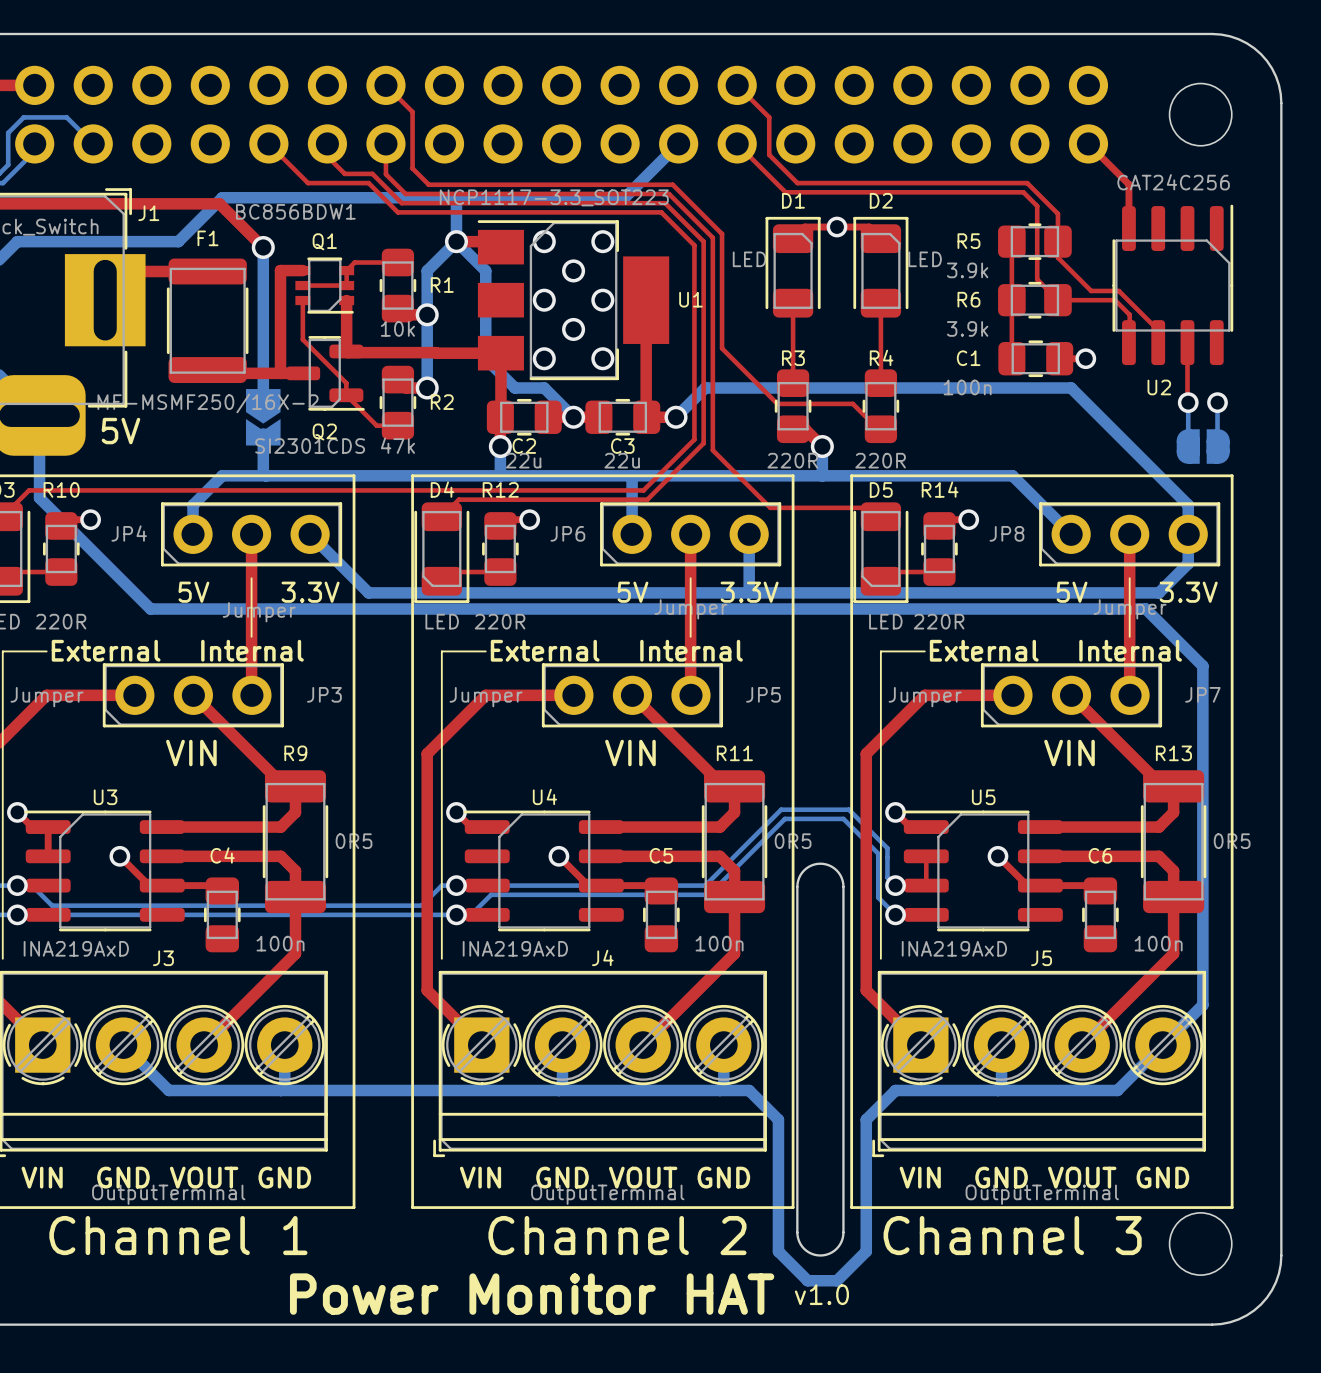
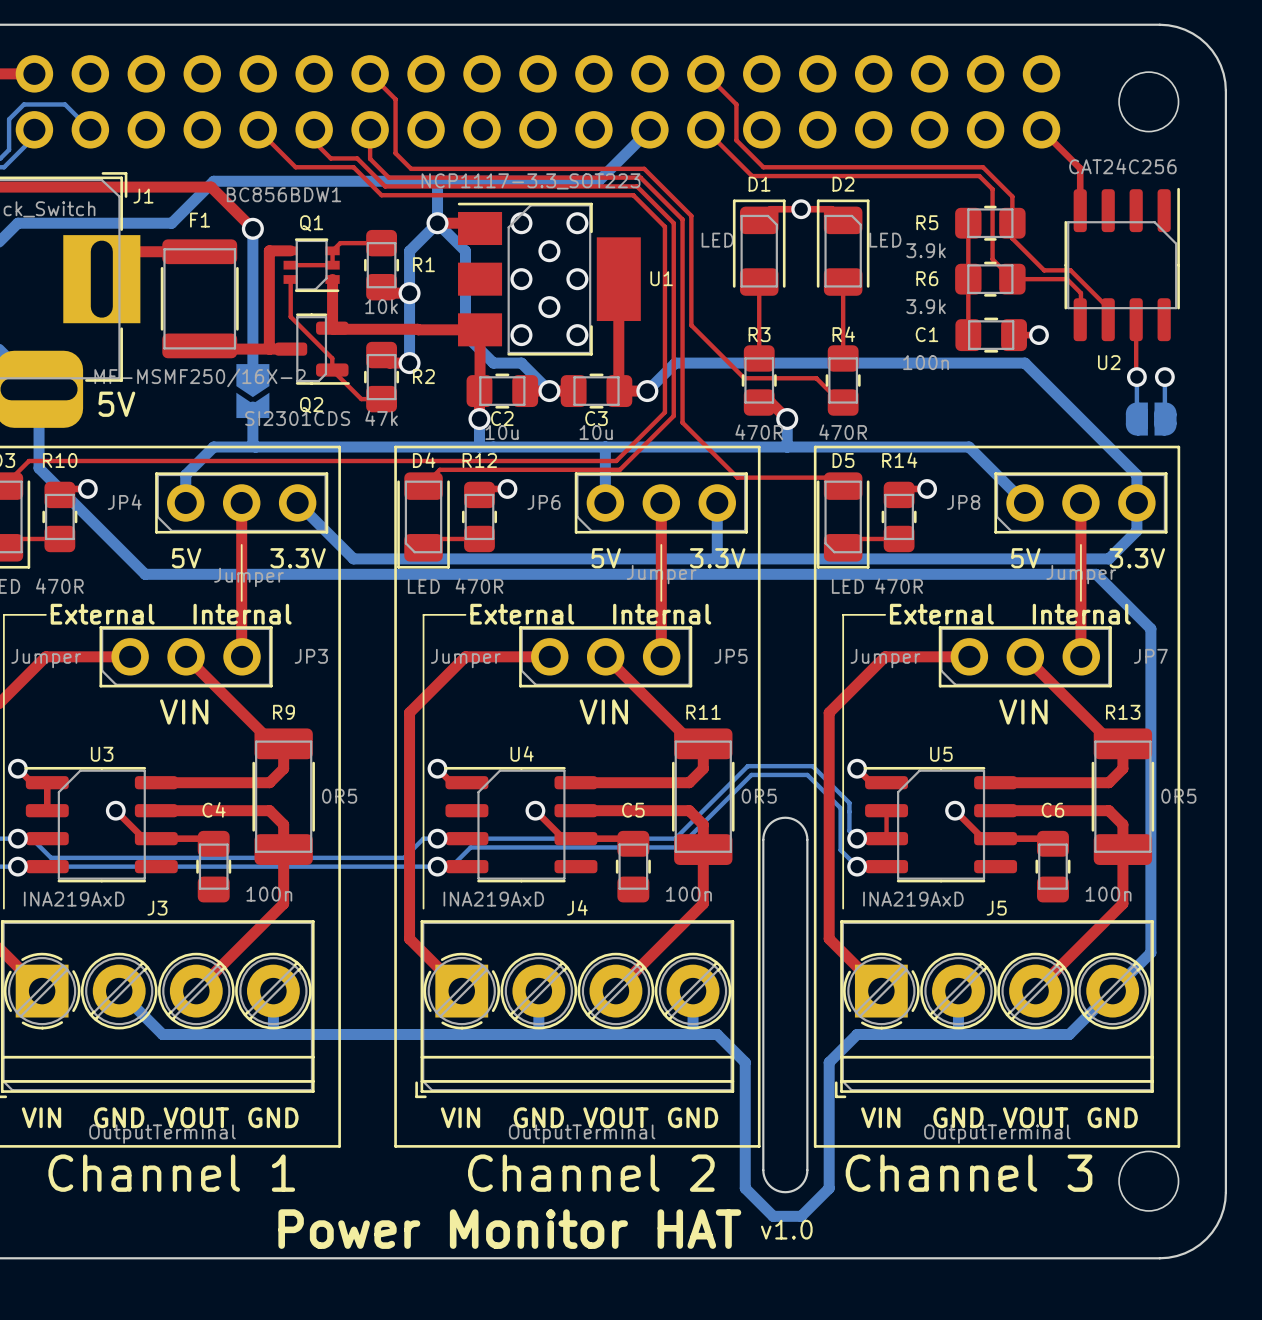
C2 value: 22u (523, 460) -> 10u (502, 432)
C3 value: 22u (622, 460) -> 10u (596, 432)
R3 value: 220R (792, 460) -> 470R (759, 432)
R4 value: 220R (880, 460) -> 470R (843, 432)
R10 value: 220R (61, 621) -> 470R (59, 586)
R12 value: 220R (500, 621) -> 470R (479, 586)
R14 value: 220R (939, 621) -> 470R (899, 586)

